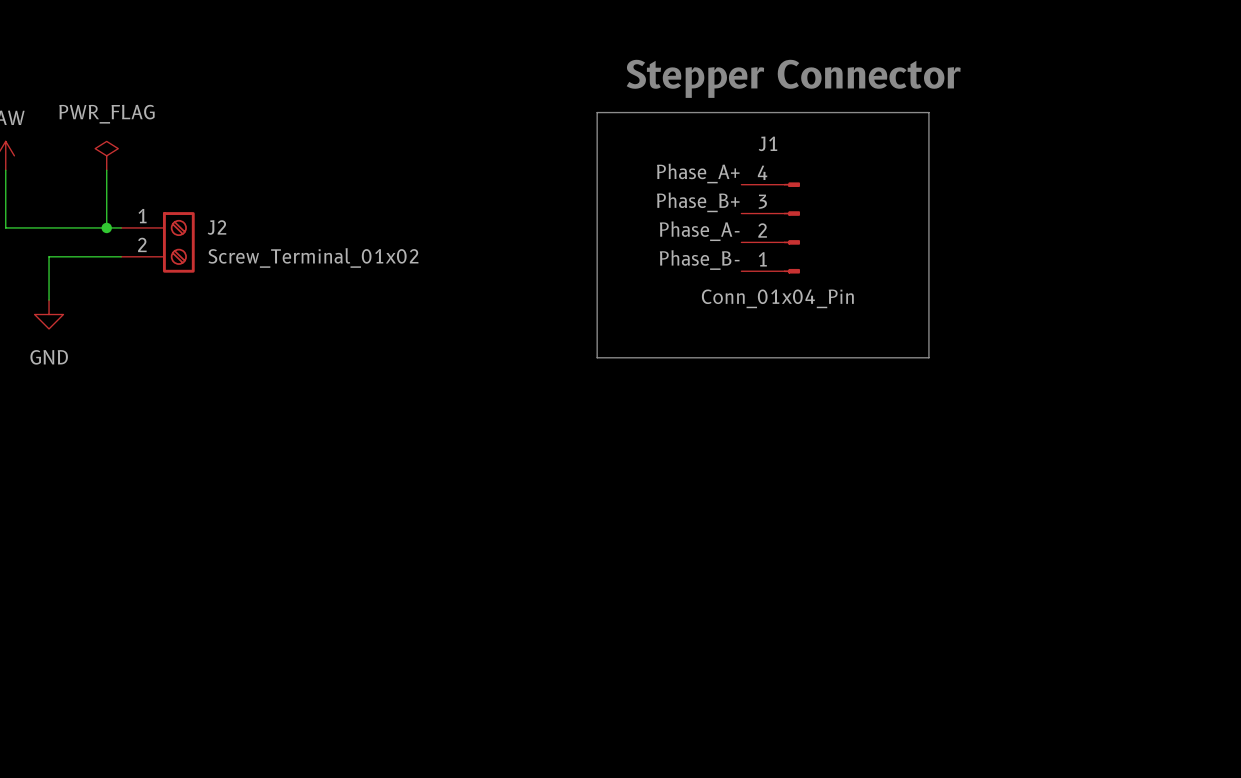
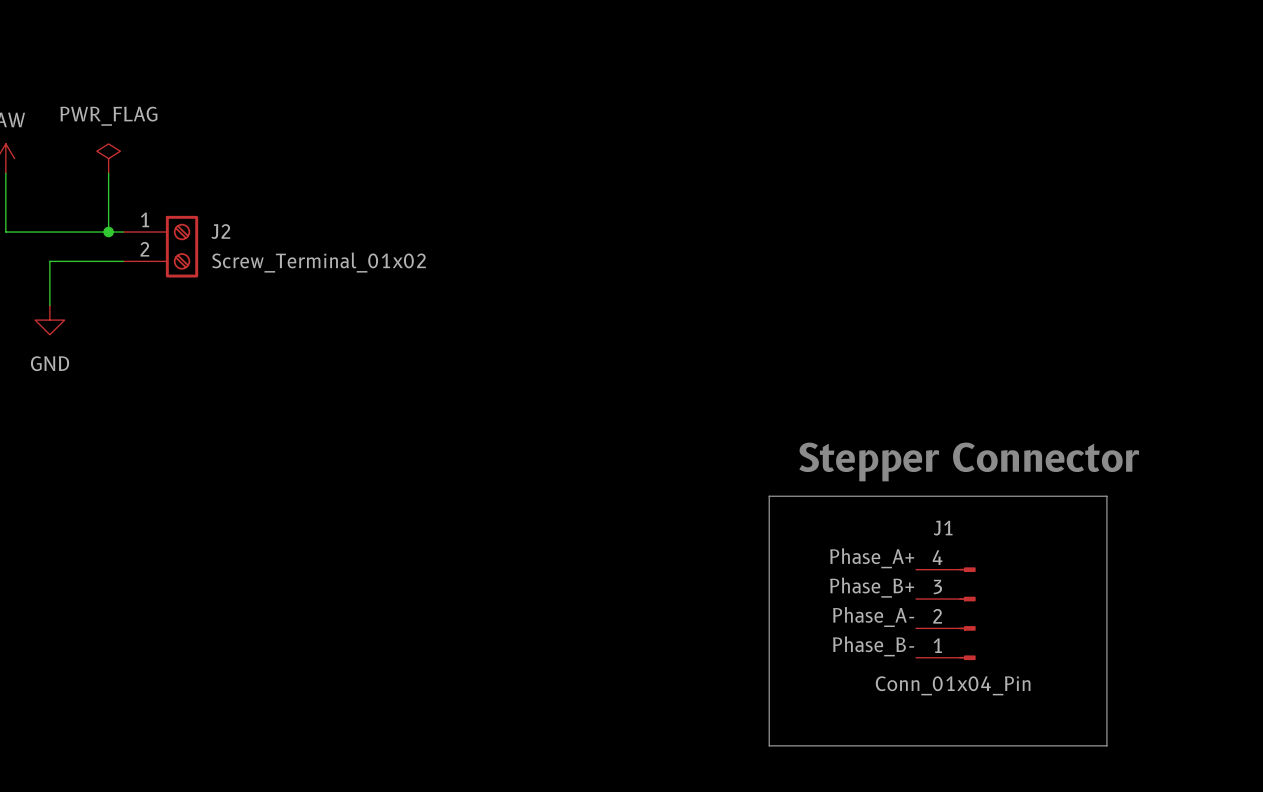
text: Stepper Connector (793, 78) -> none
line: (597, 112) (928, 112) (928, 357) (597, 357) (597, 112) -> none
label: Phase_A+ (698, 173) -> none
label: Phase_B+ (698, 202) -> none
J1 position: (770, 227) -> (945, 613)
label: Phase_A- (699, 231) -> none
label: Phase_B- (699, 260) -> none
text: none -> Stepper Connector (969, 461)
line: none -> (769, 496) (1106, 496) (1106, 745) (769, 745) (769, 496)
label: none -> Phase_A+ (872, 558)
label: none -> Phase_B+ (872, 587)
label: none -> Phase_A- (873, 617)
label: none -> Phase_B- (873, 646)

